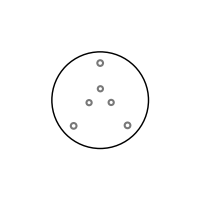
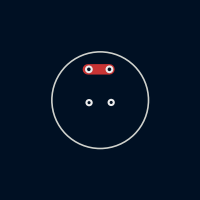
via: (100, 63) -> none
track: none -> (87, 69) (109, 69)
via: none -> (88, 69)
via: none -> (109, 69)
via: (100, 88) -> none
via: (73, 125) -> none
via: (127, 125) -> none

